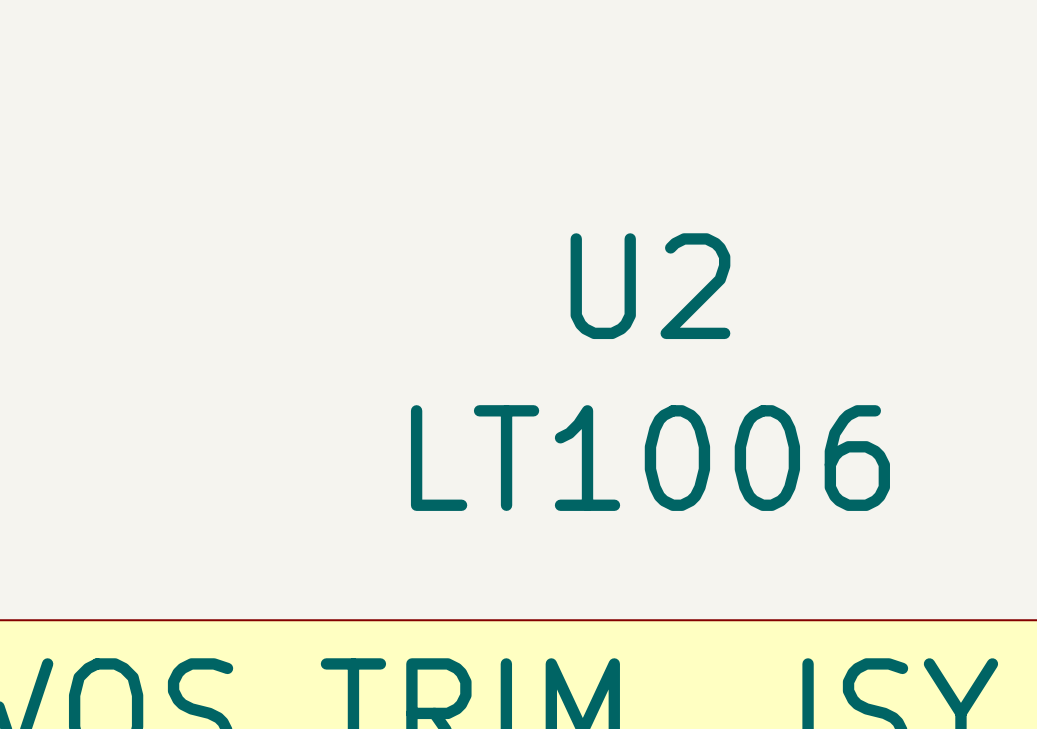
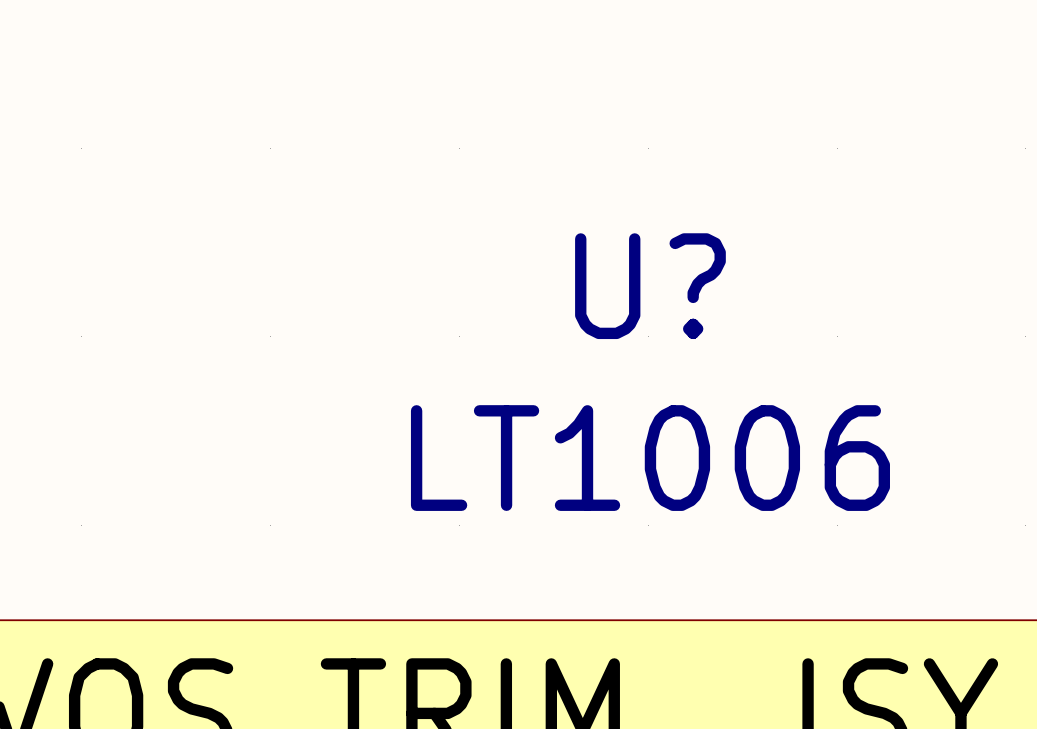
U2 name: U2 (650, 286) -> U? (650, 286)

